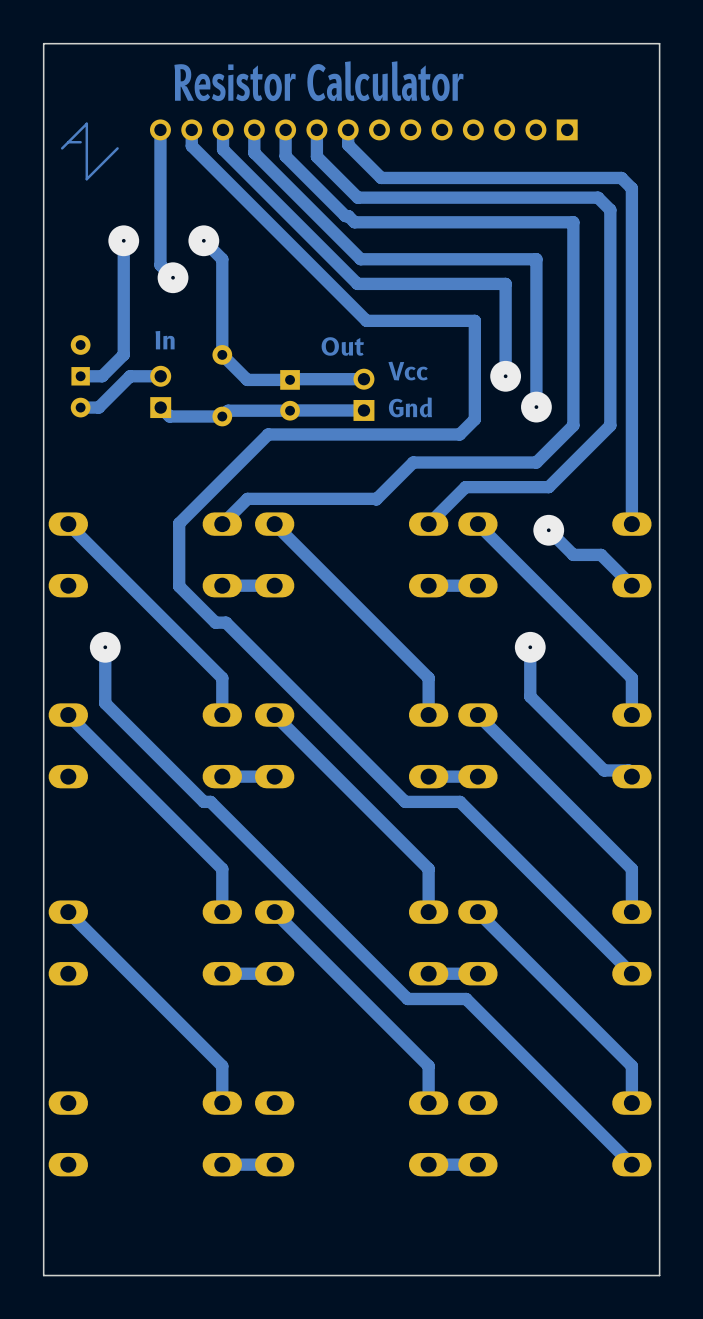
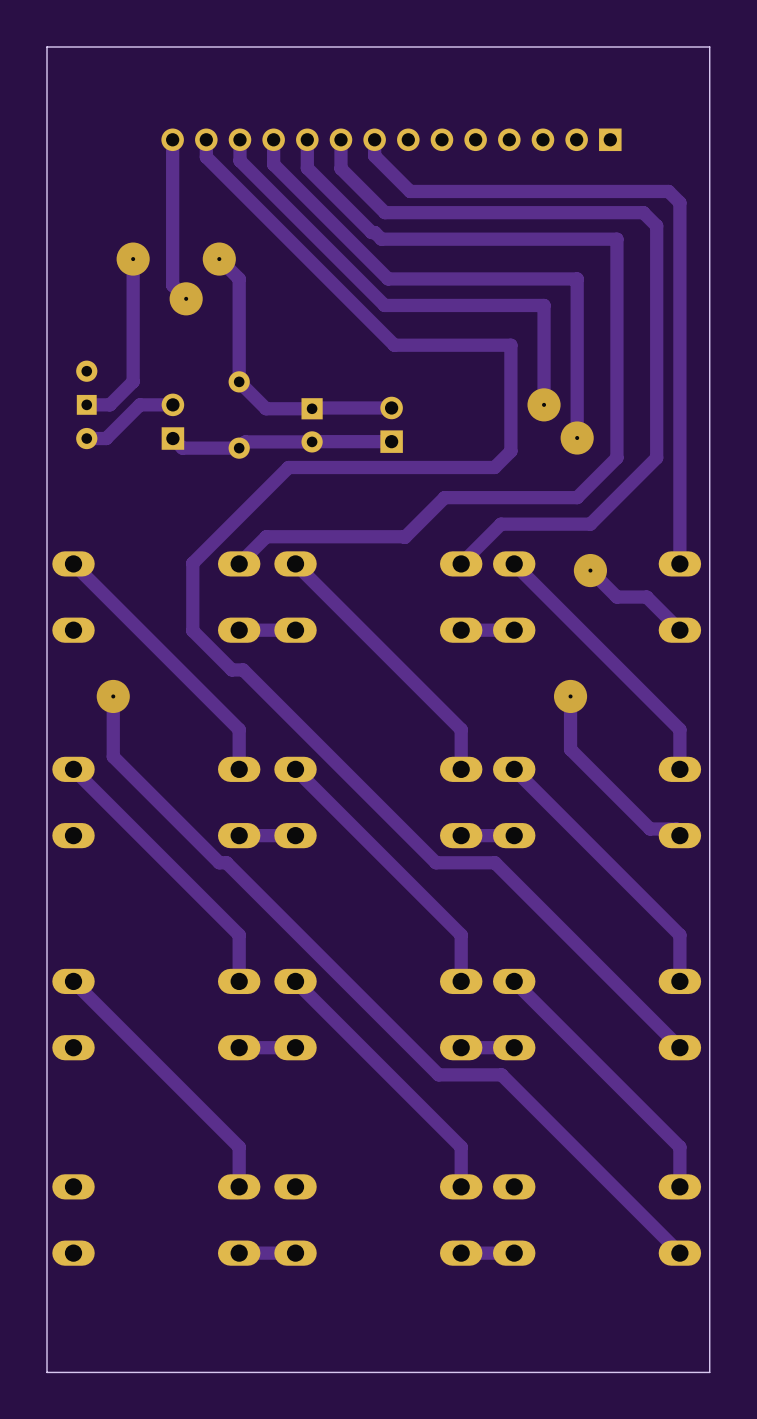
text: Resistor Calculator (318, 81) -> none
track: (80, 142) (68, 142) -> none
track: (117, 148) (86, 179) (86, 123) (62, 148) -> none
text: In (165, 340) -> none
text: Out (342, 346) -> none
text: Vcc (408, 371) -> none
text: Gnd (410, 407) -> none

